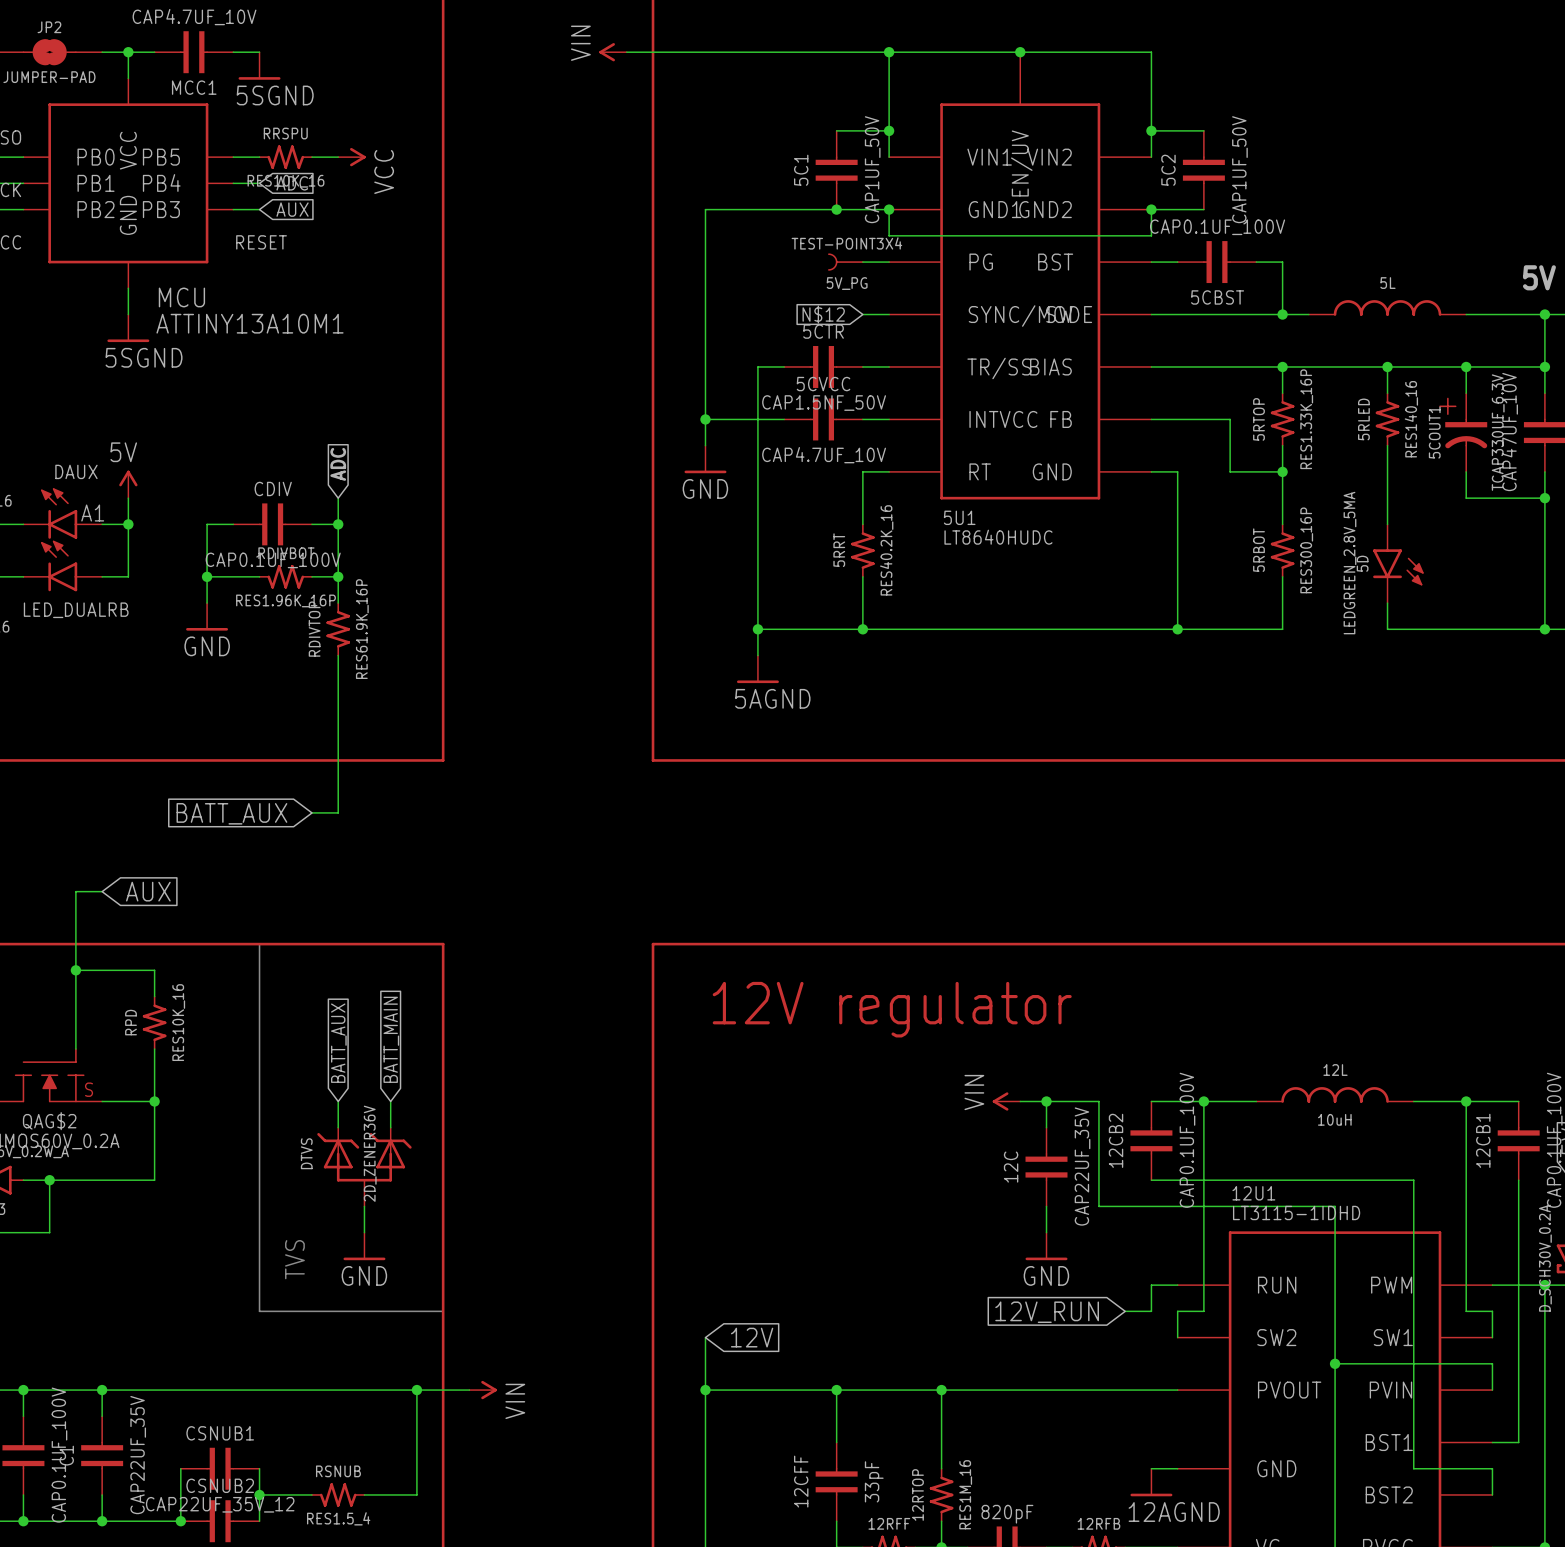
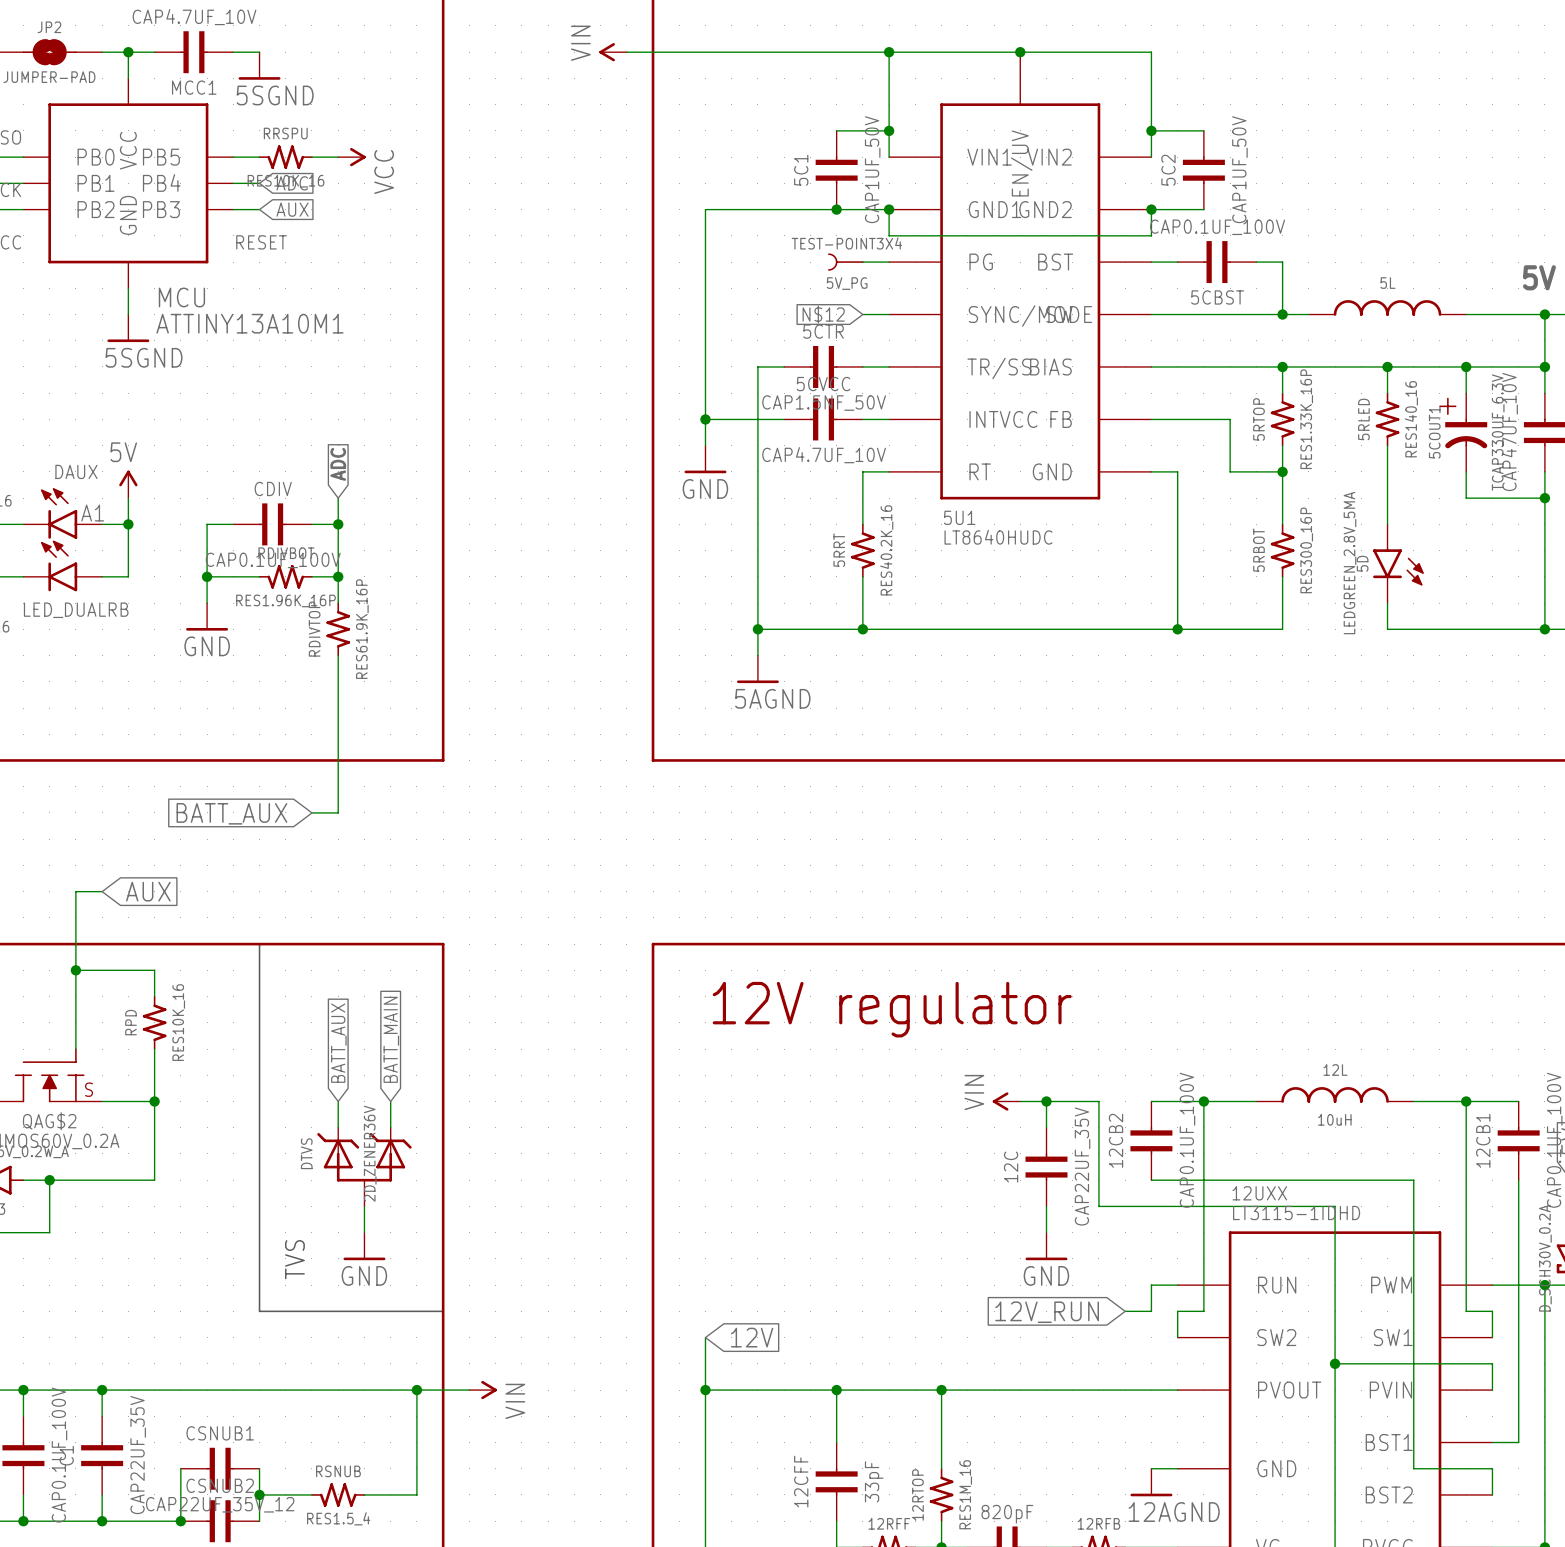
12U1 name: 12U1 (1253, 1193) -> 12UXX (1259, 1193)

